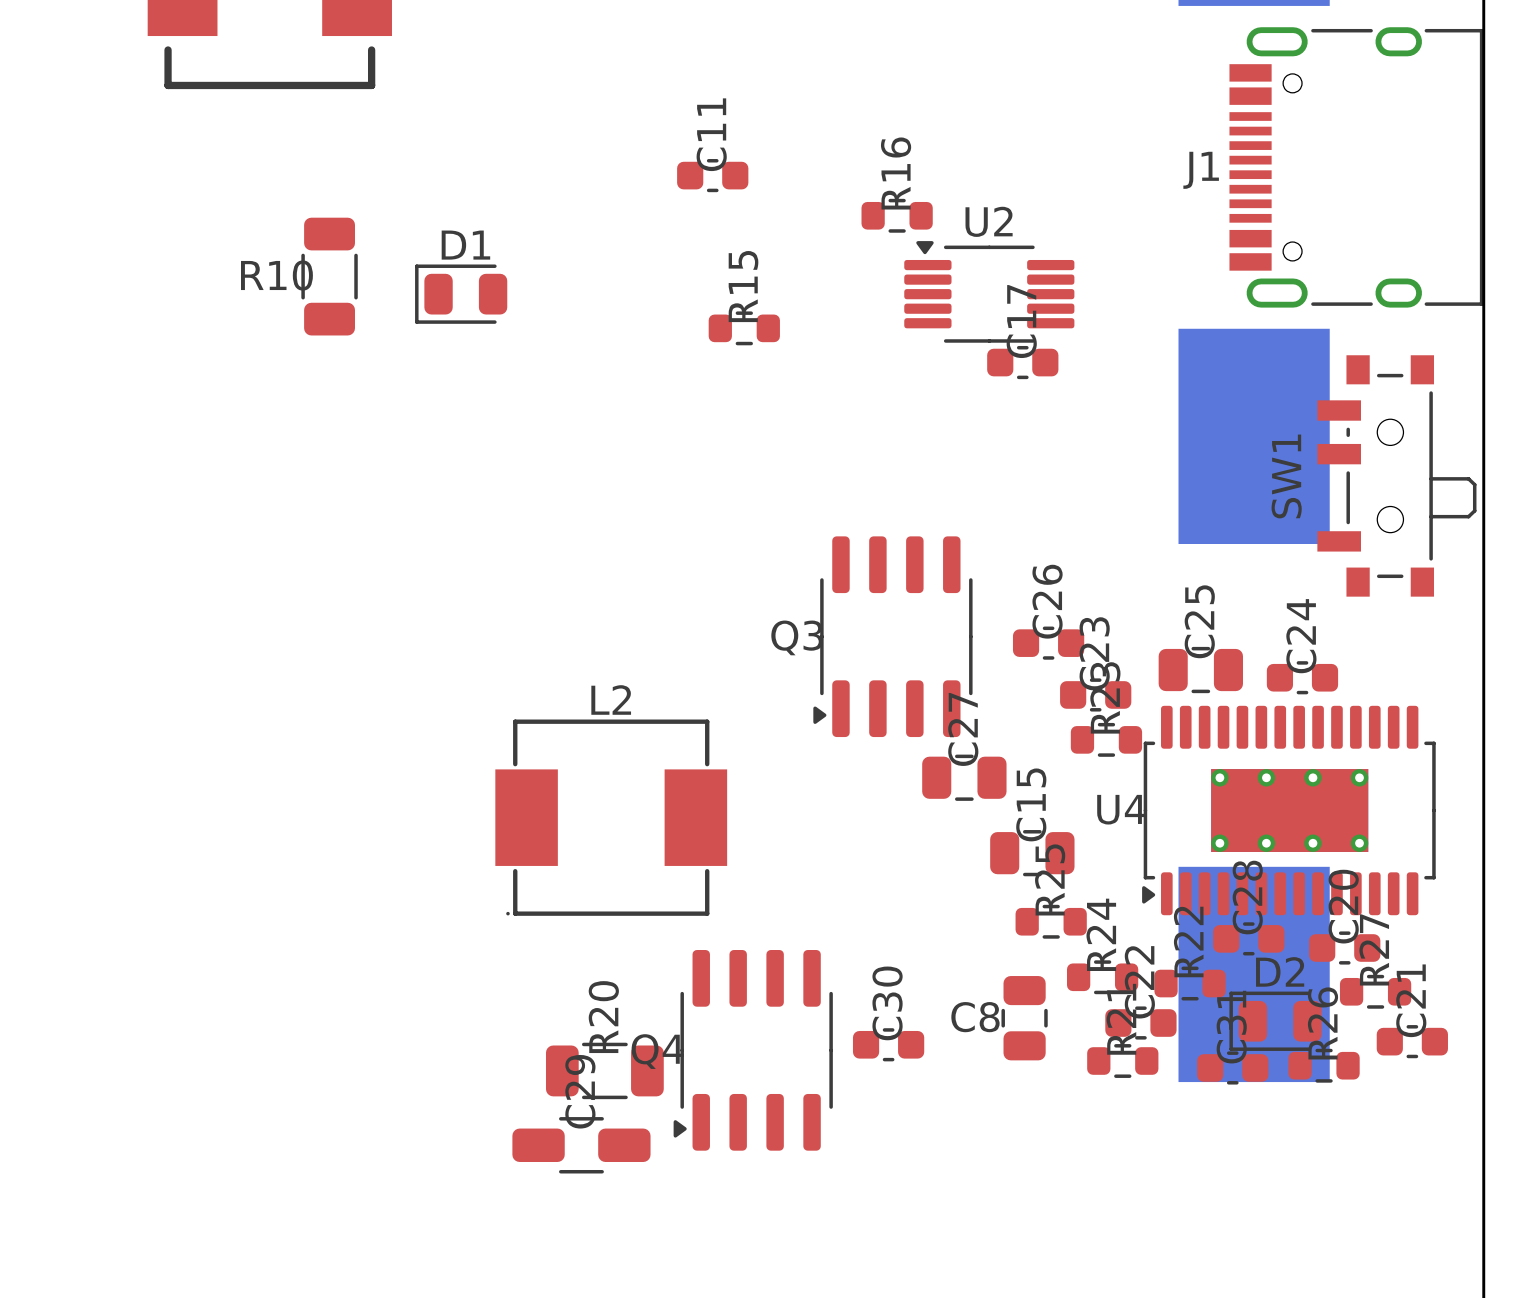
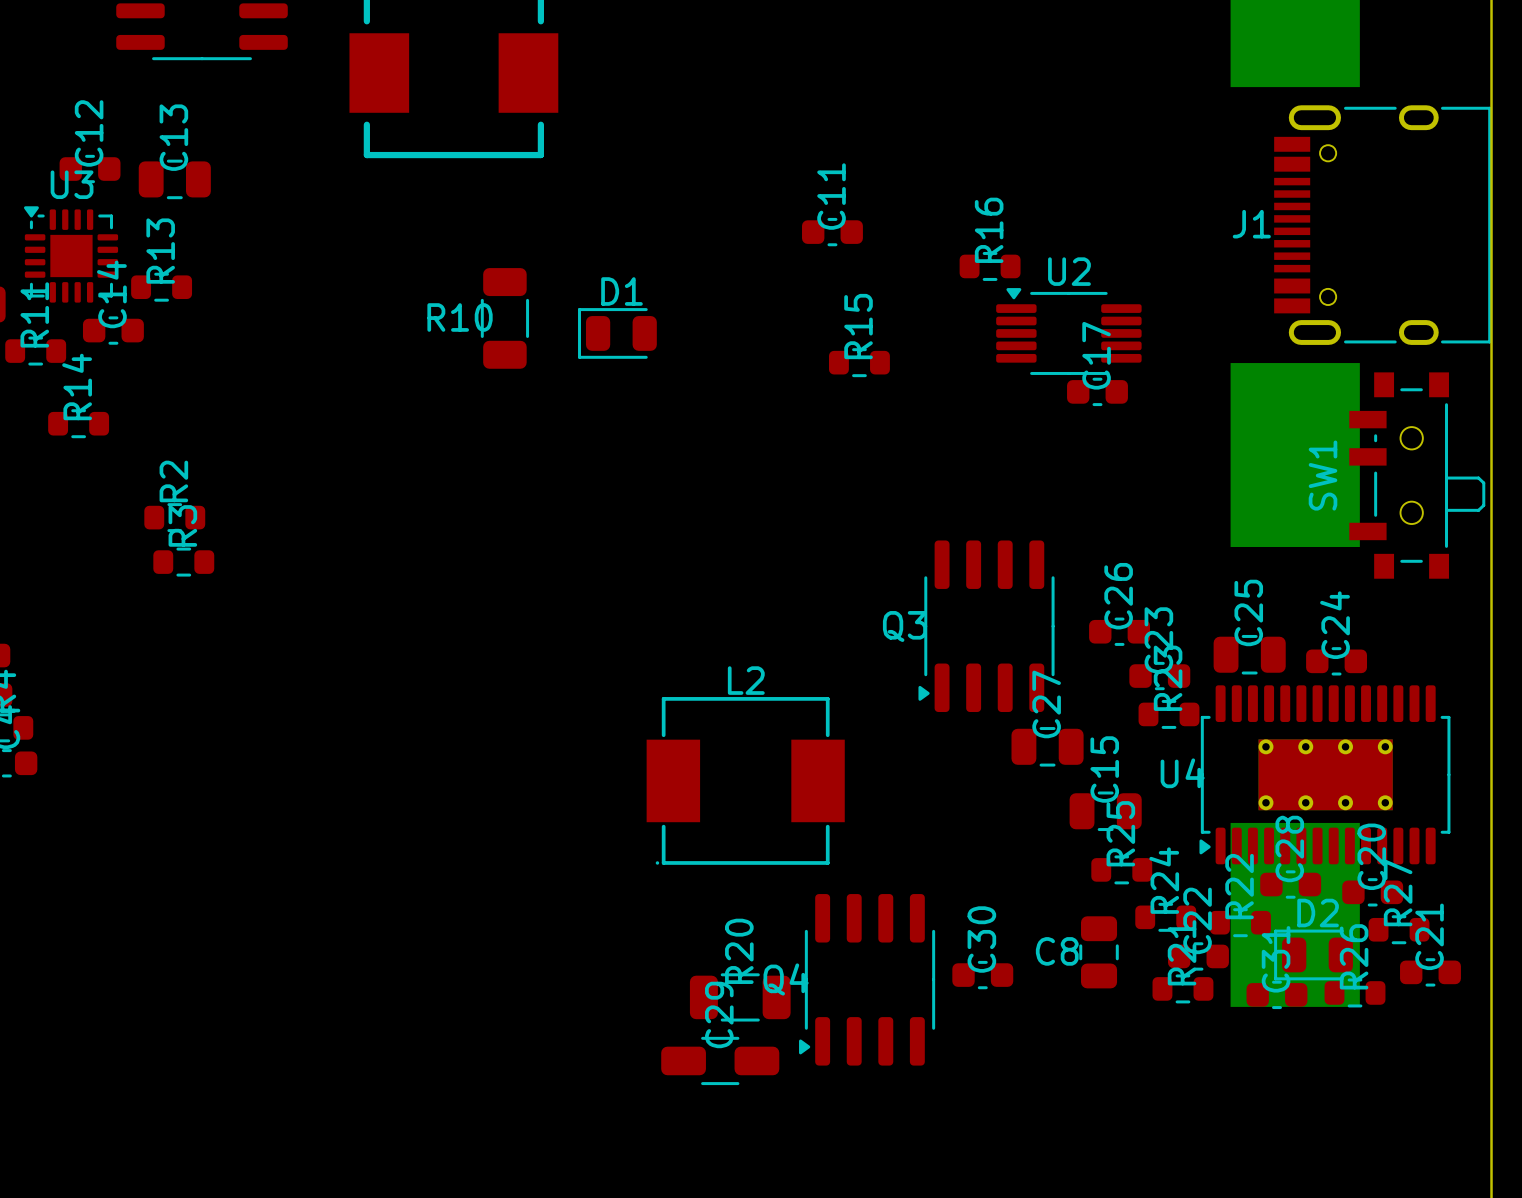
SW1 position: (1396, 475) -> (1417, 475)

